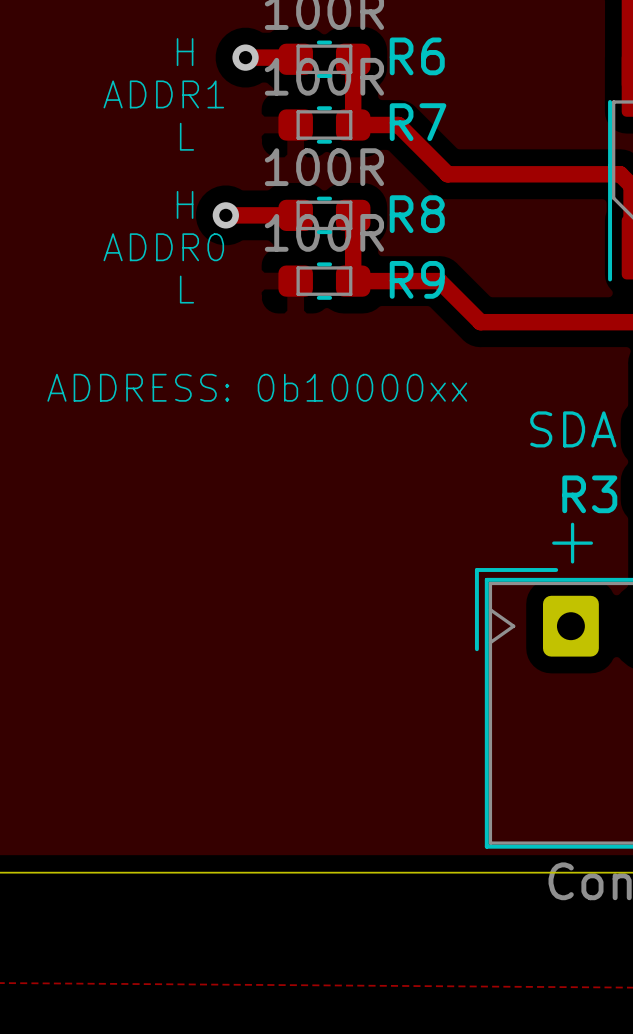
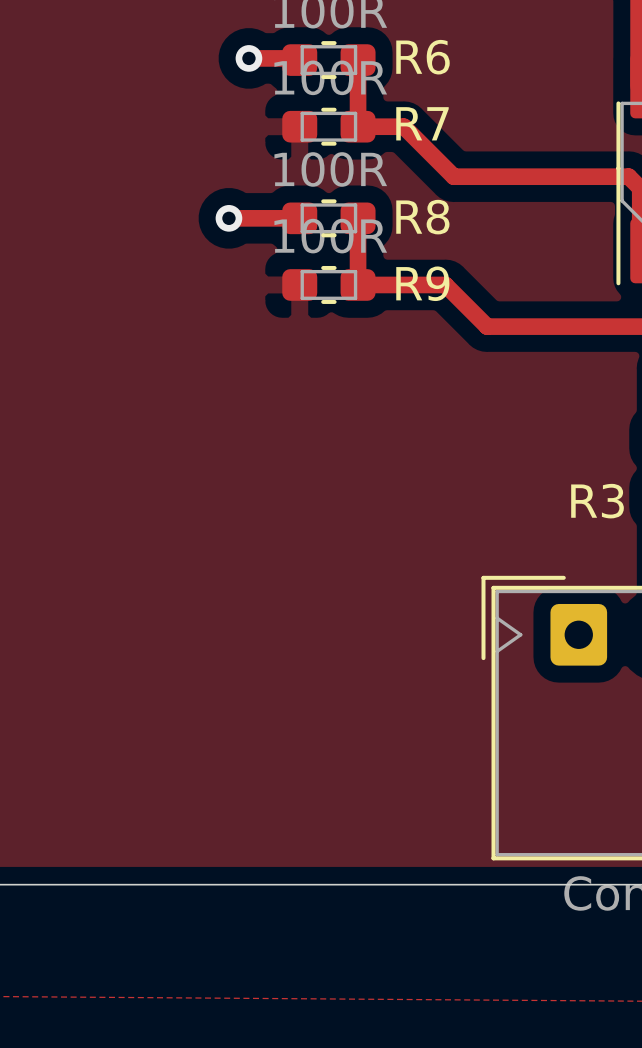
text: H (185, 52) -> none
text: ADDR1 (163, 94) -> none
text: L (186, 136) -> none
text: H (185, 204) -> none
text: ADDR0 (163, 247) -> none
text: L (186, 289) -> none
text: ADDRESS: 0b10000xx (257, 387) -> none
text: SDA (573, 429) -> none
text: + (572, 543) -> none

